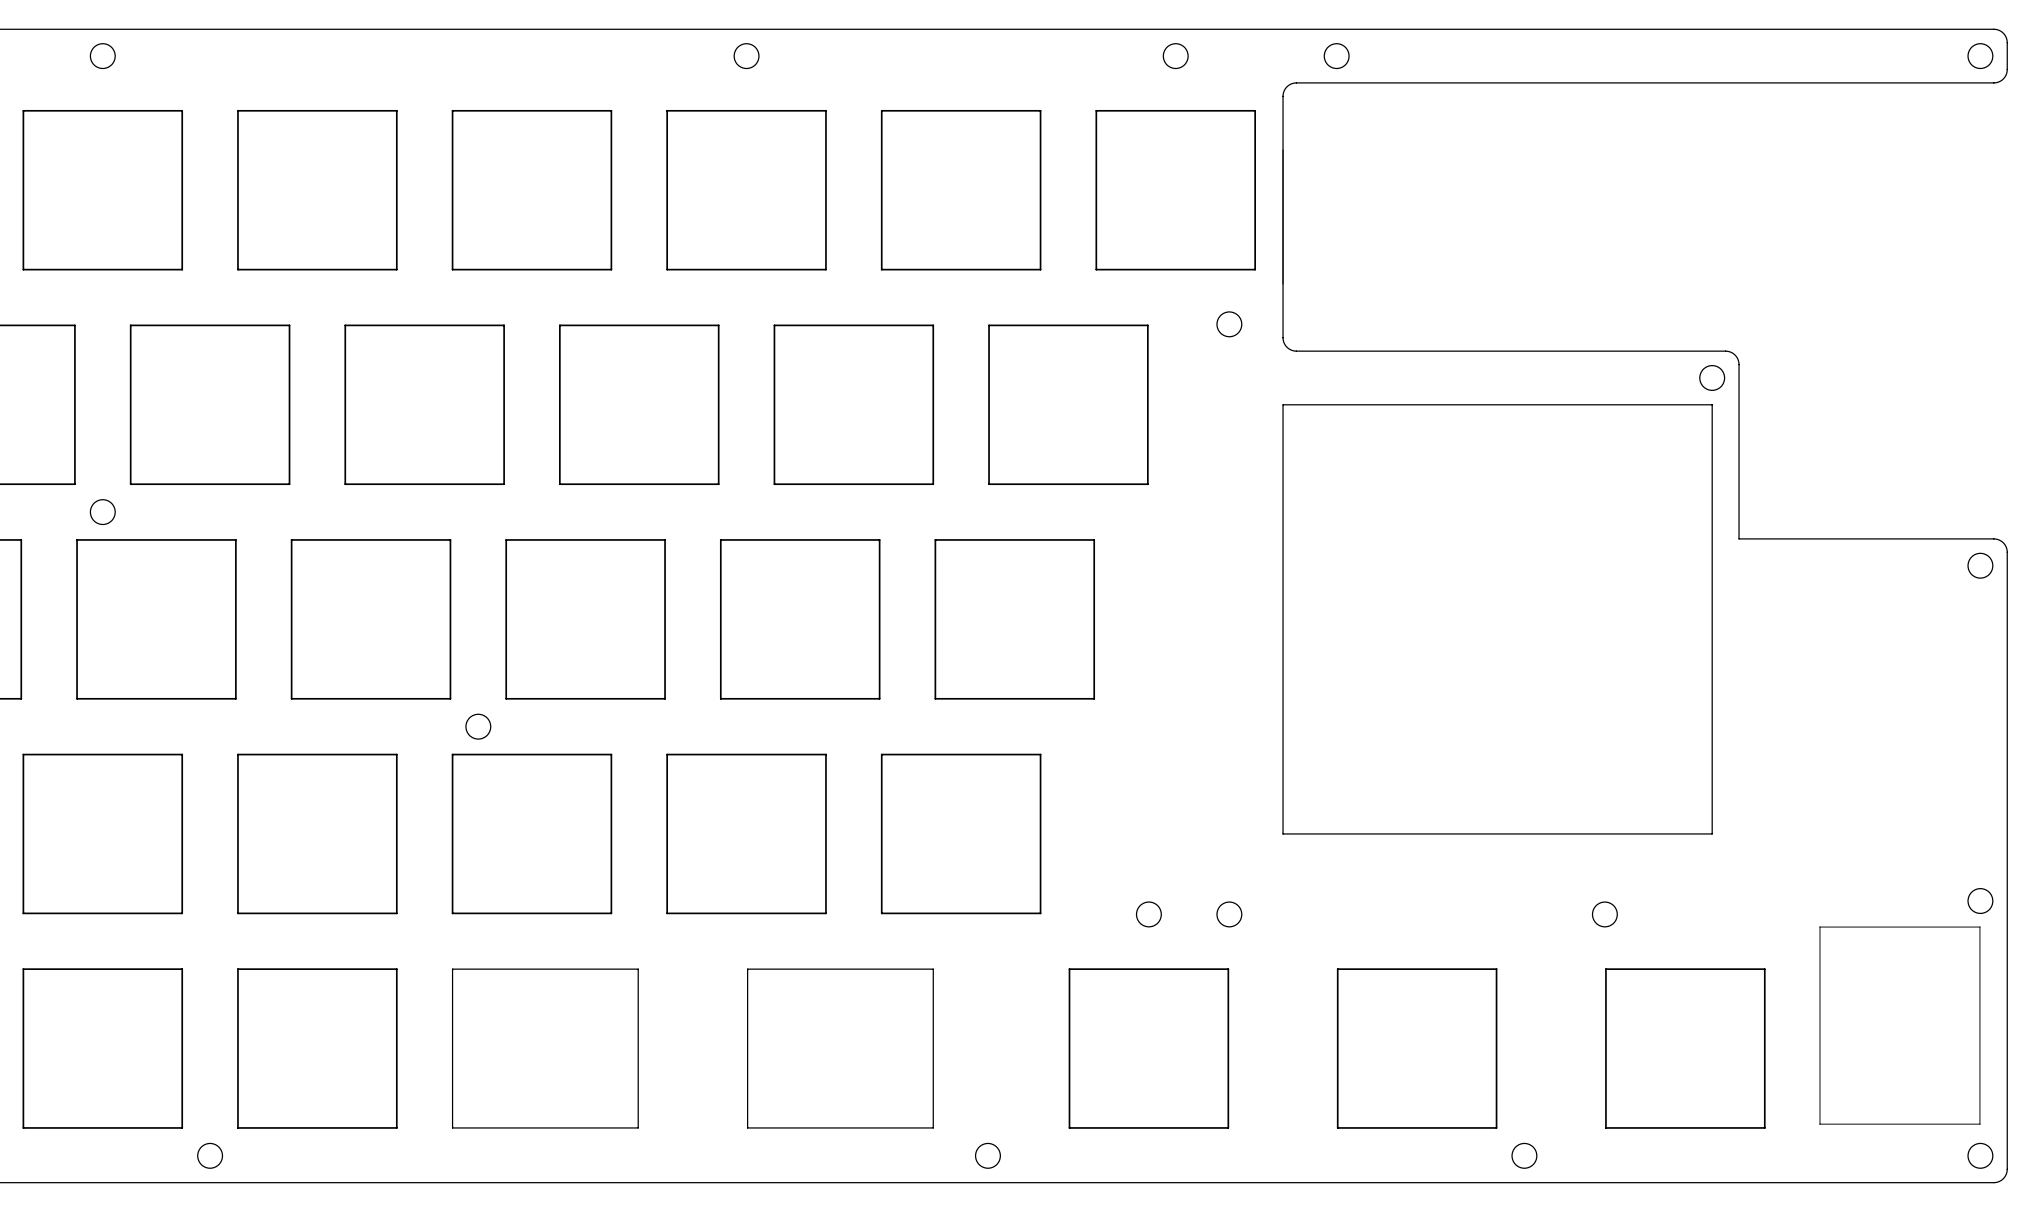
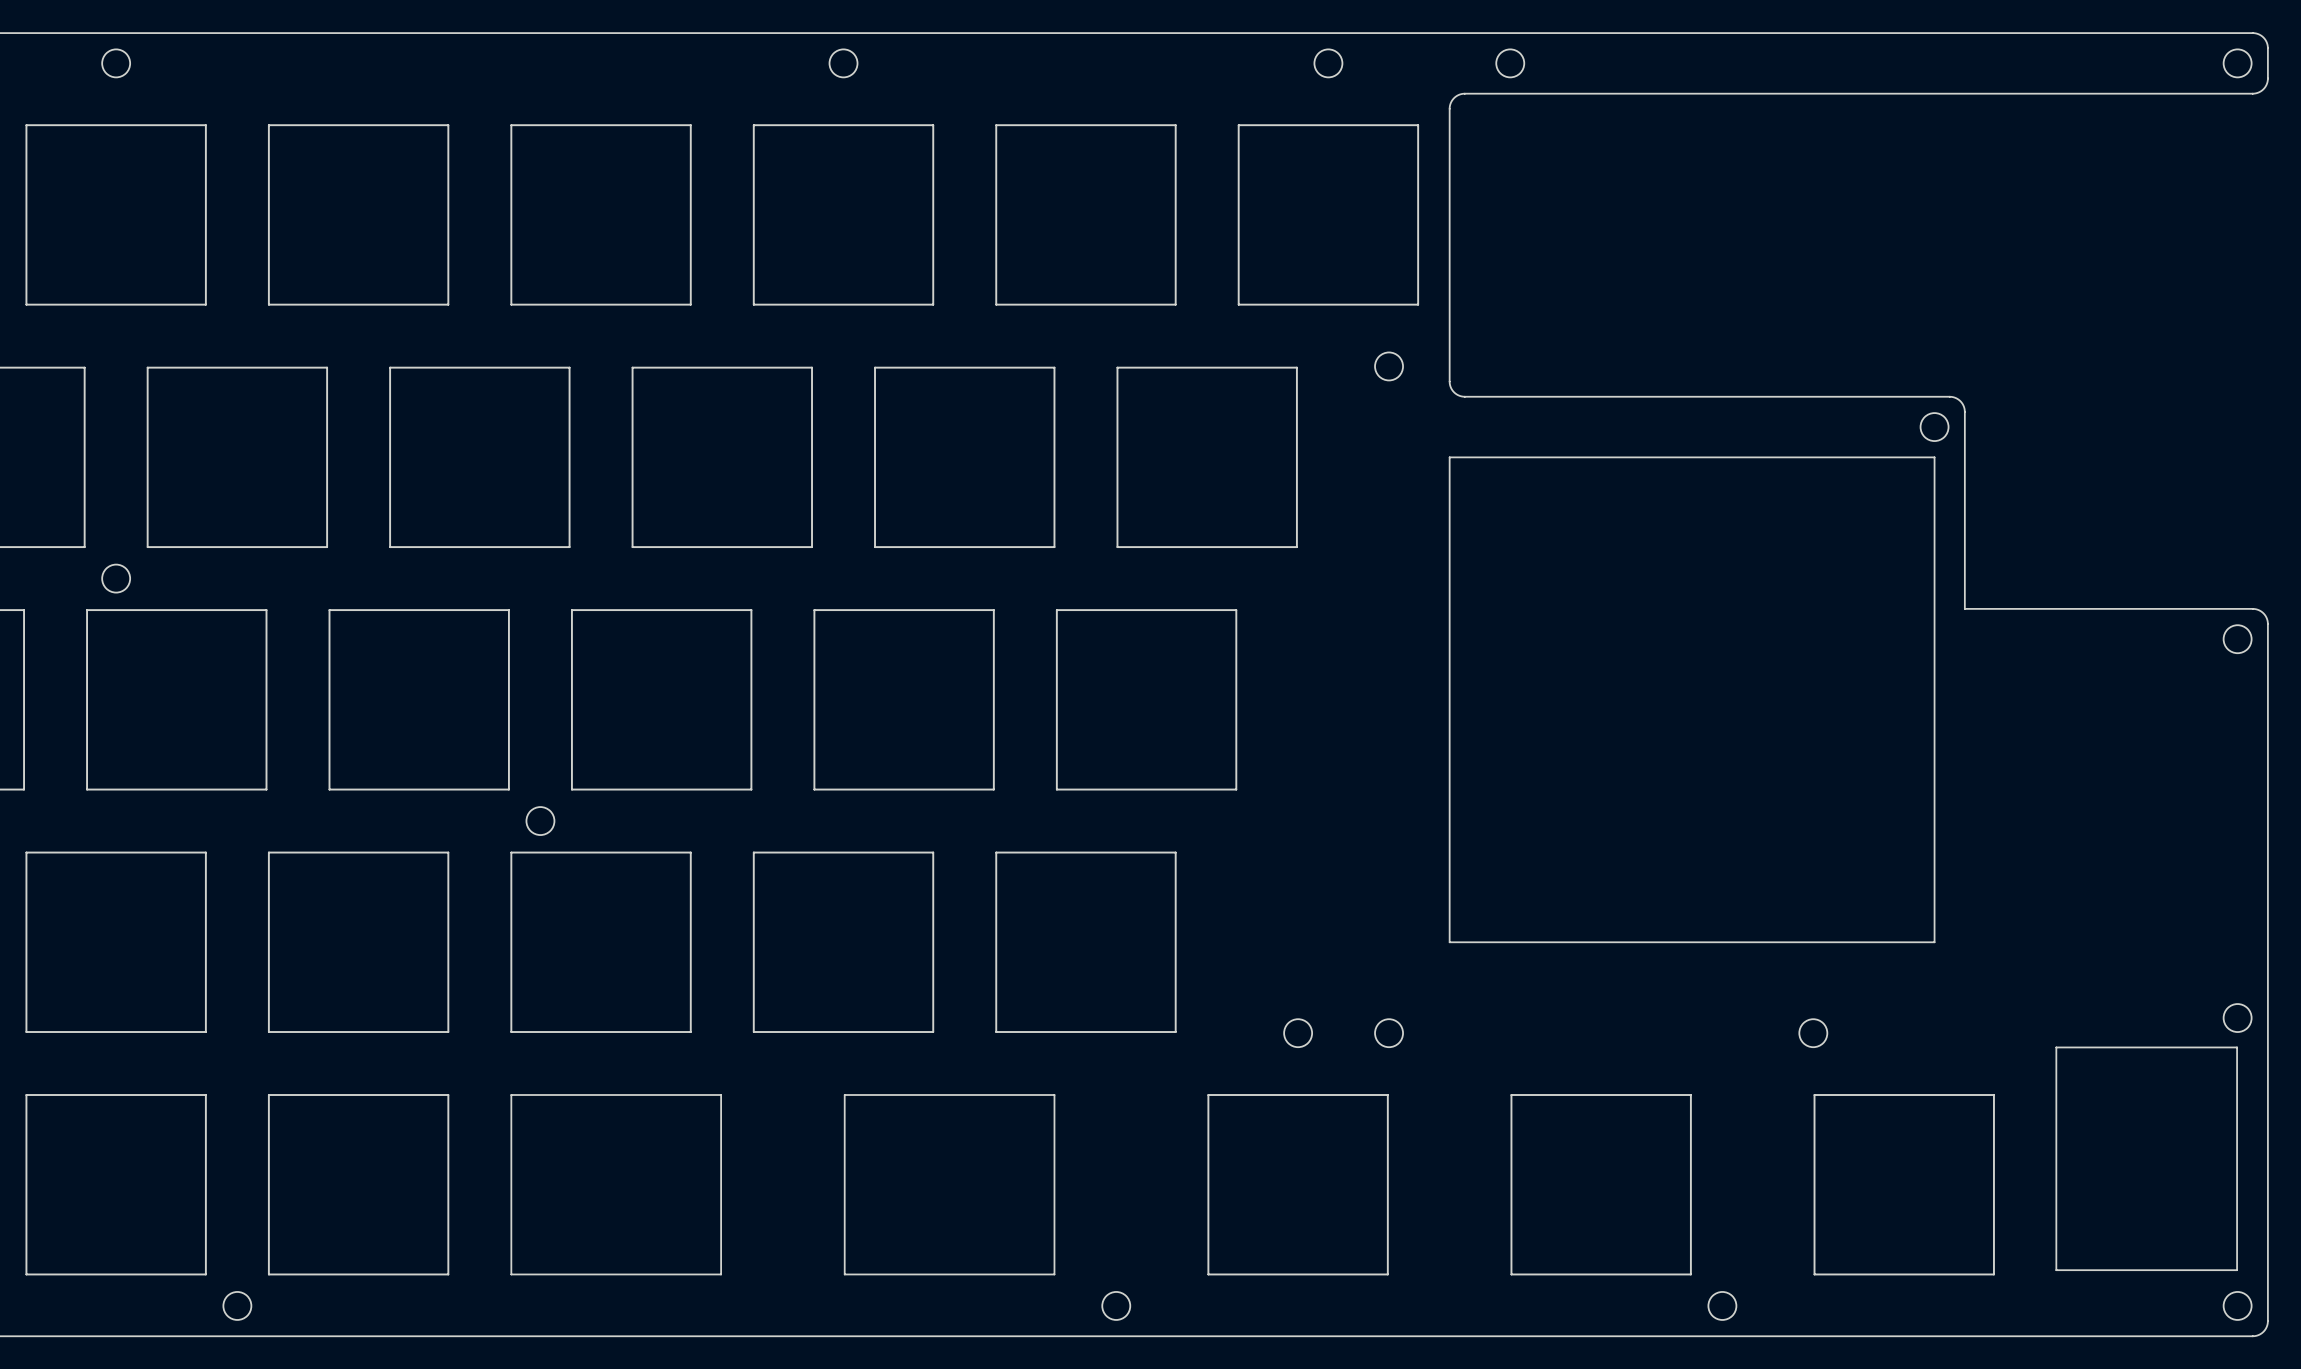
line: (1283, 149) (1283, 284) -> none
line: (1979, 927) (1819, 927) (1819, 1124) (1979, 1124) (1979, 927) -> none
board edge: none -> (2237, 1047) (2056, 1047) (2056, 1270) (2237, 1270) (2237, 1047)

